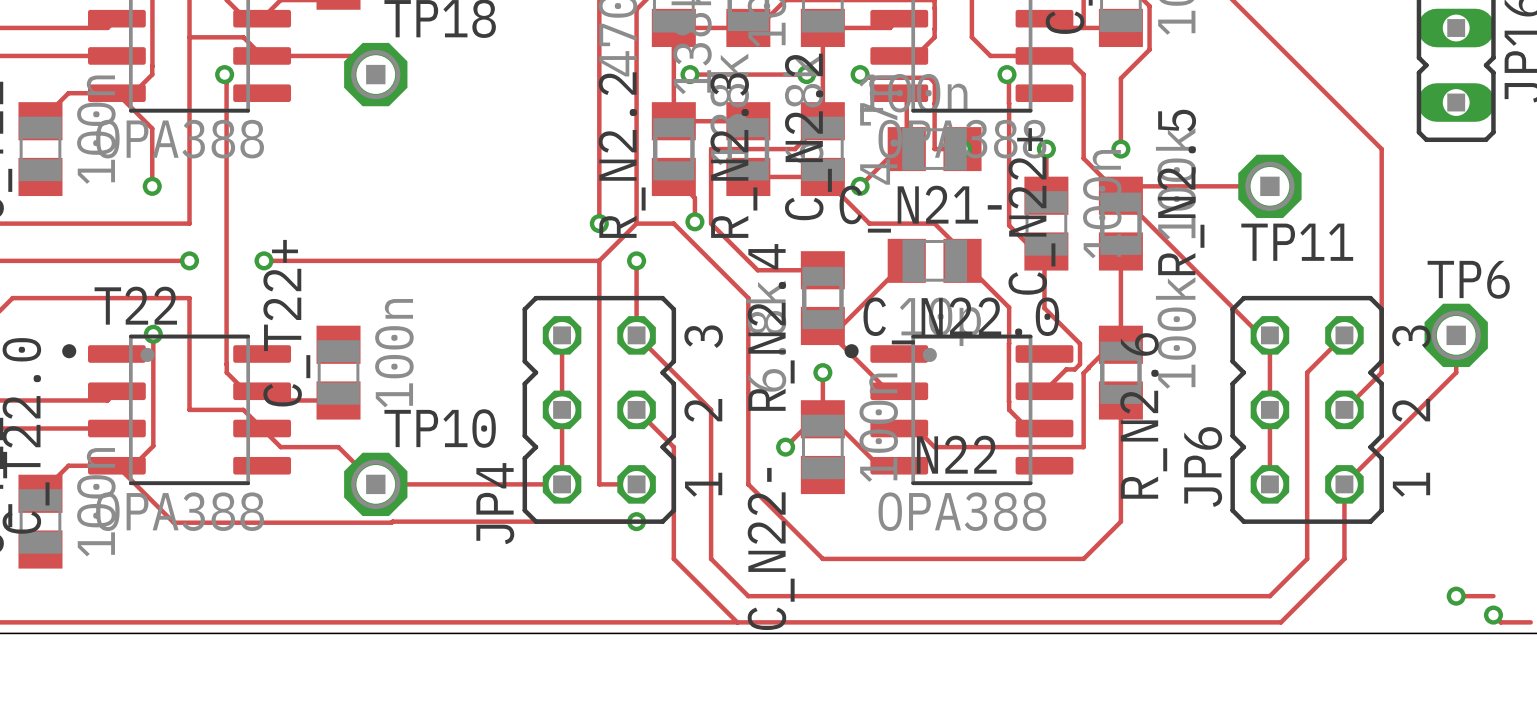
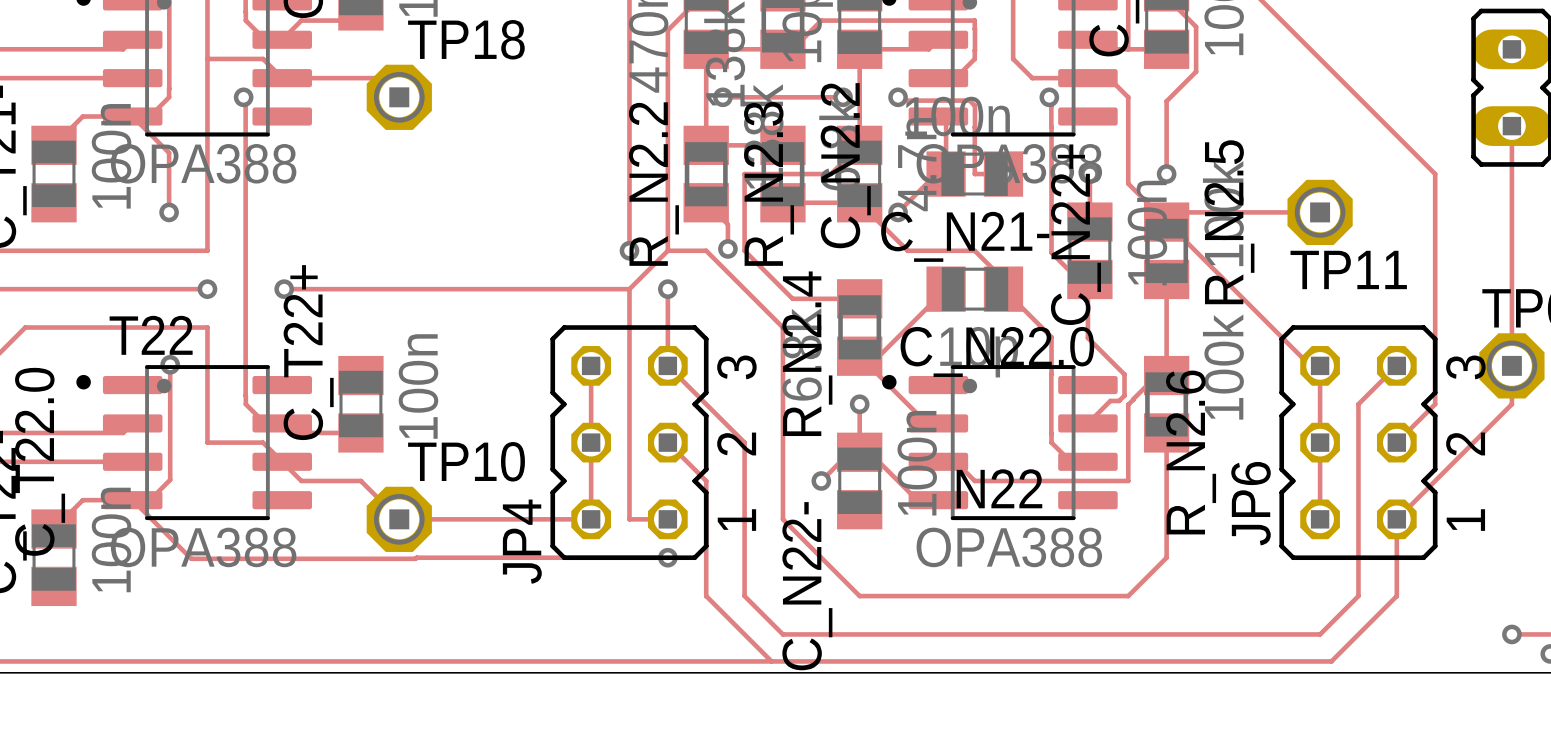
track: none -> (1511, 126) (1511, 365)

